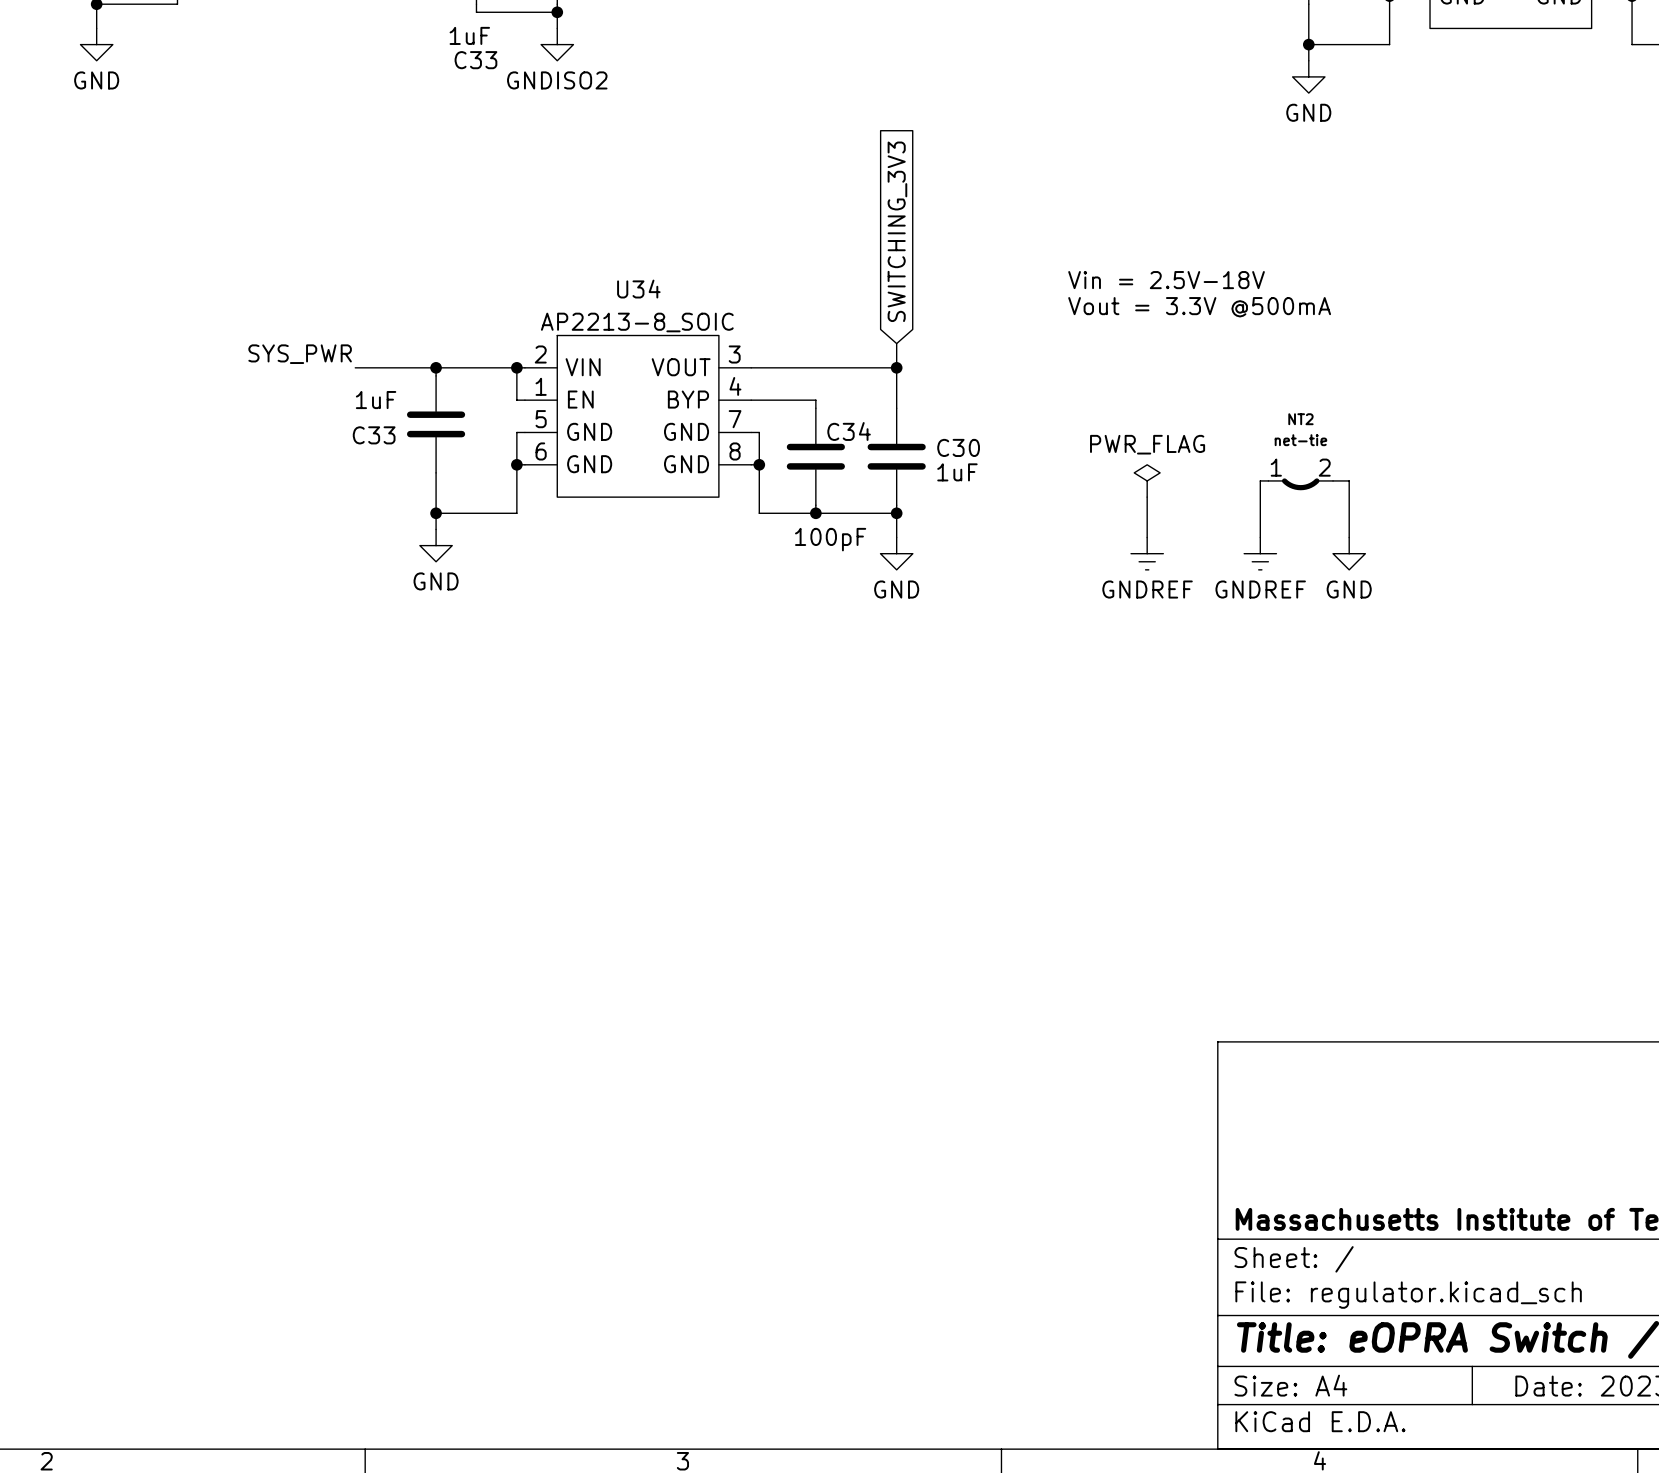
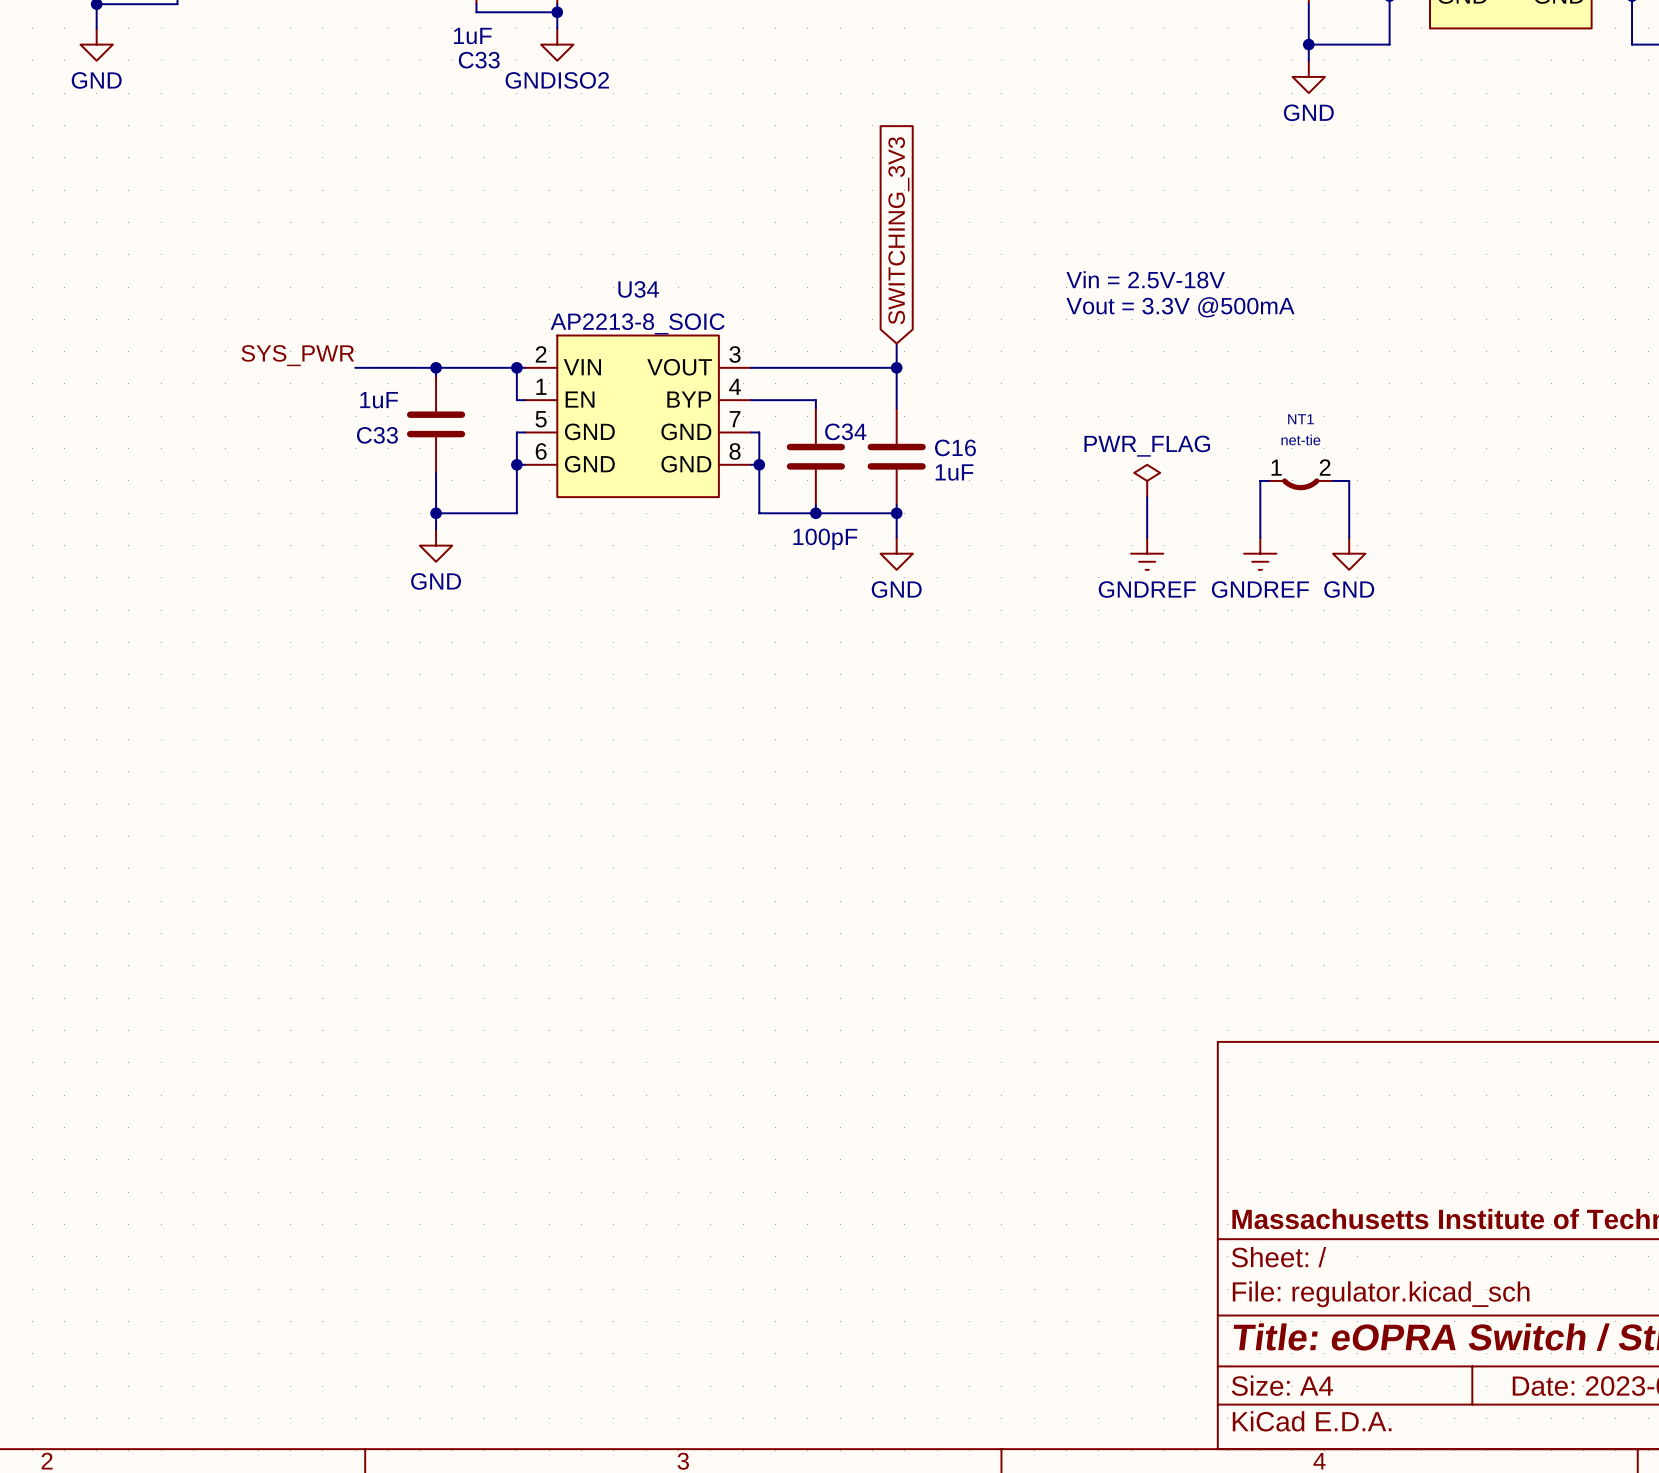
NT2 name: NT2 (1300, 419) -> NT1 (1300, 419)
C30 name: C30 (958, 447) -> C16 (955, 447)

